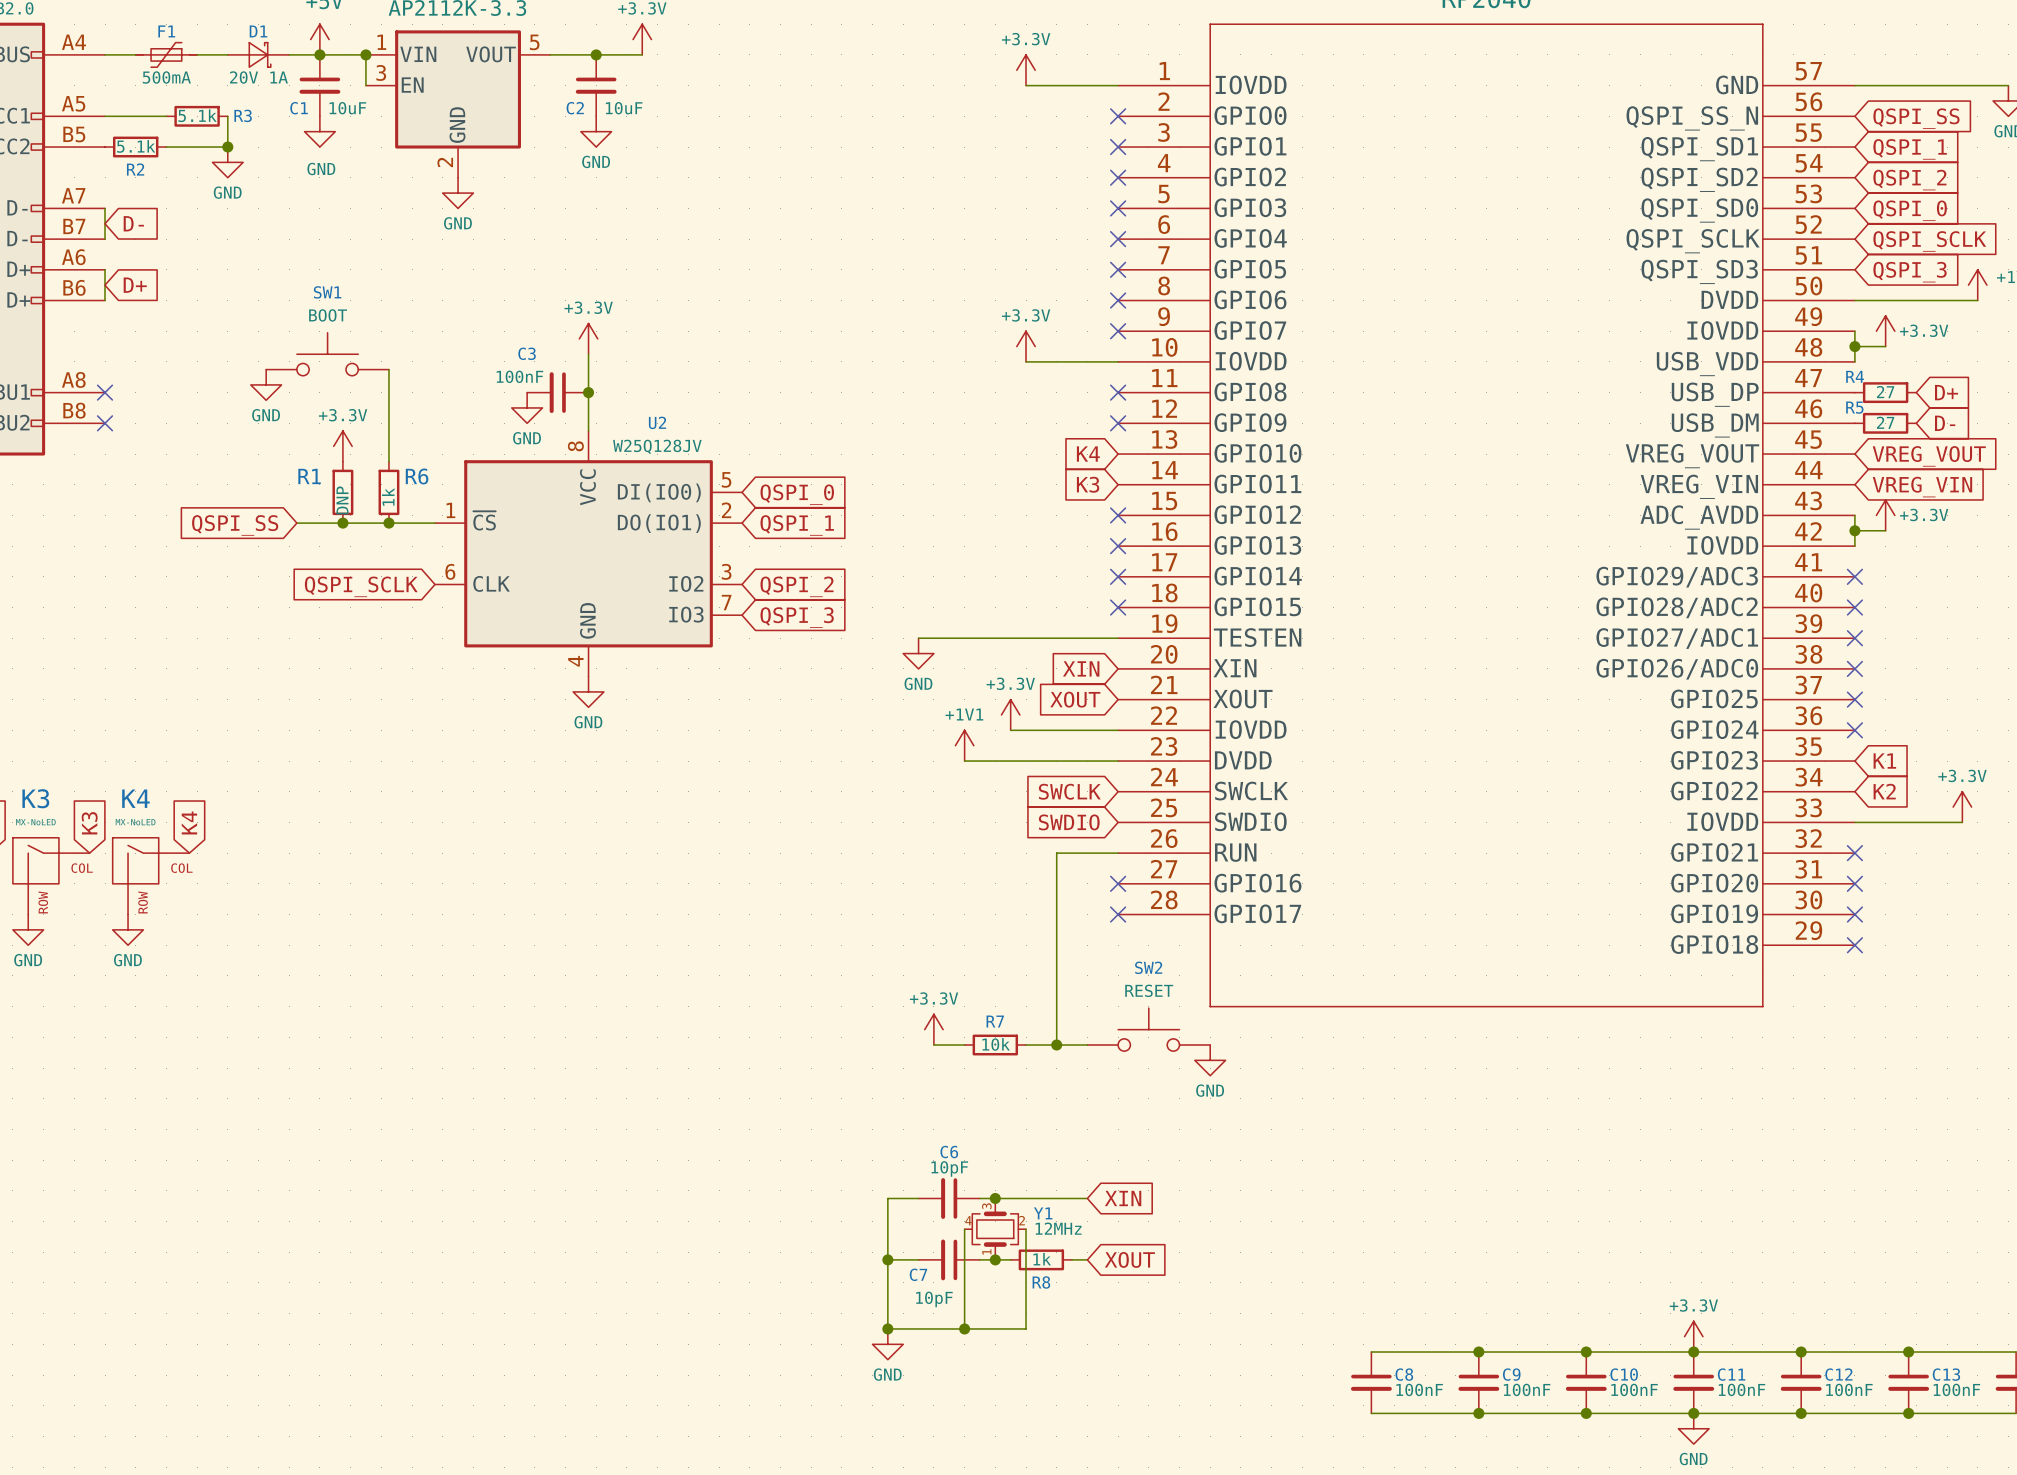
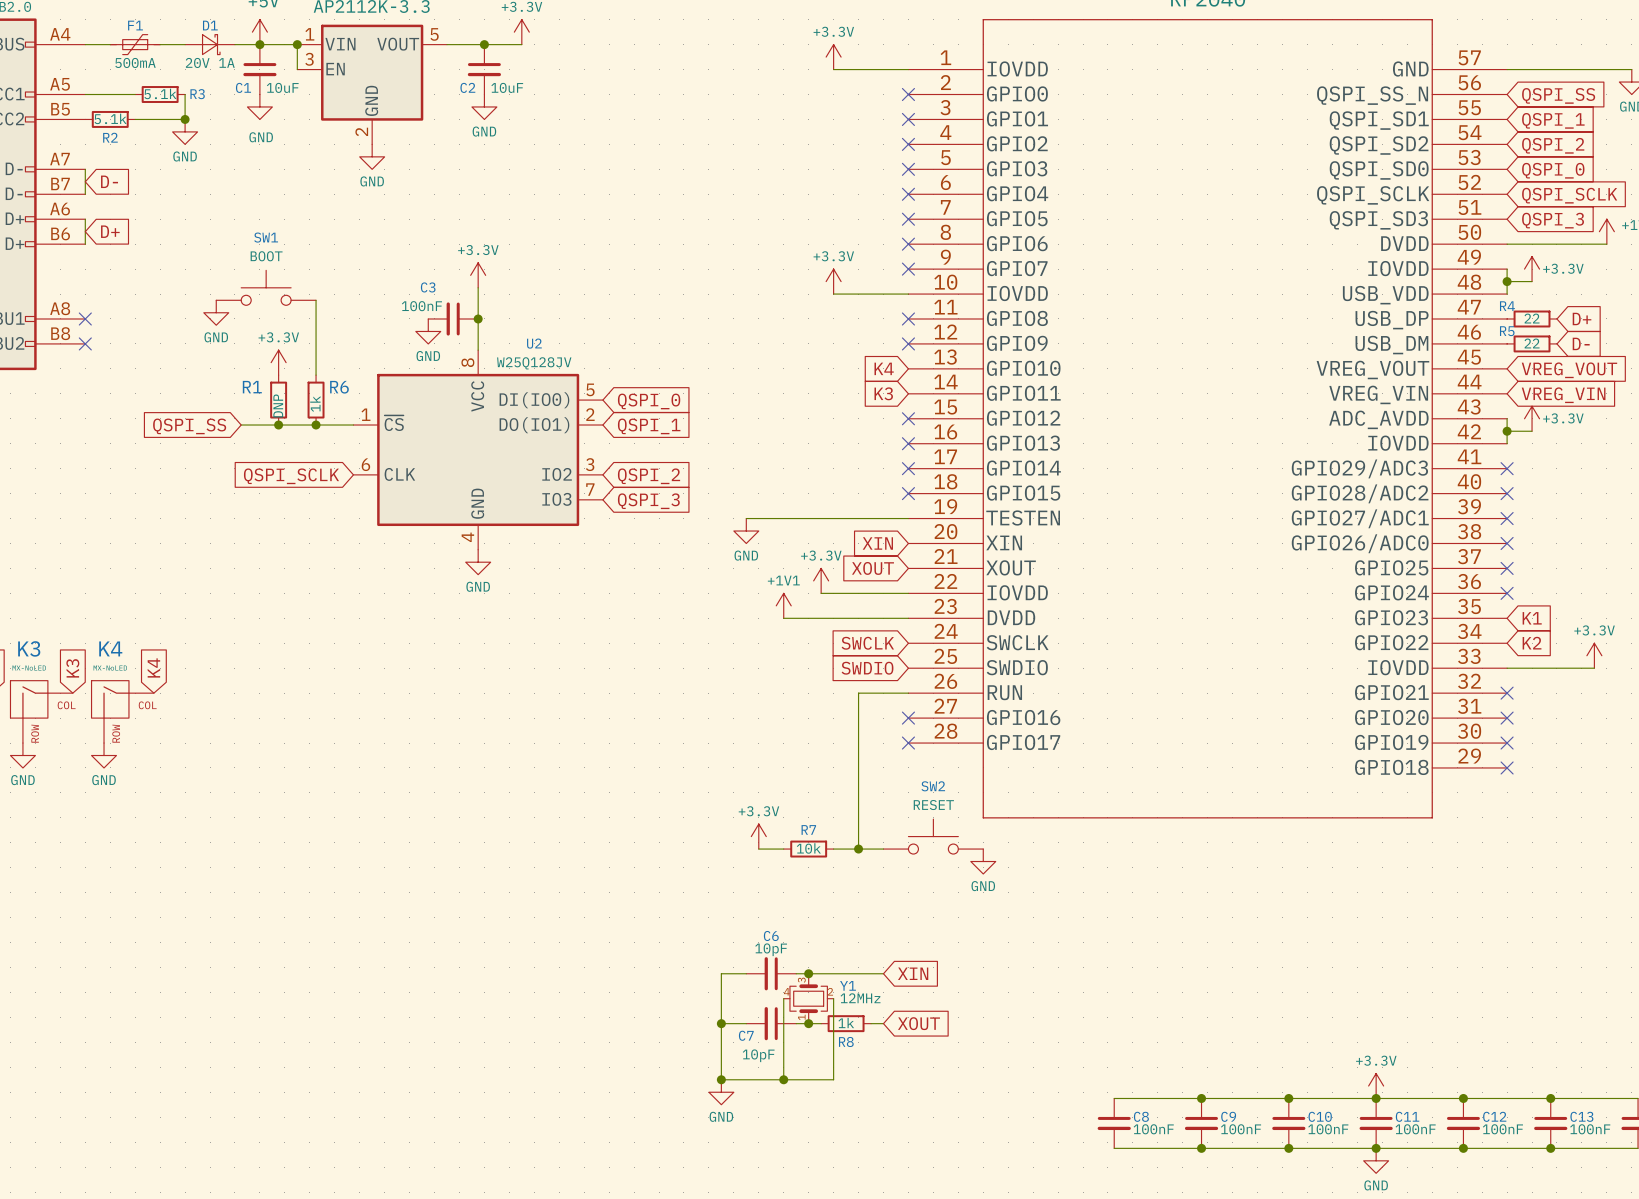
R4 value: 27 (1885, 392) -> 22 (1532, 318)
R5 value: 27 (1885, 422) -> 22 (1532, 343)

